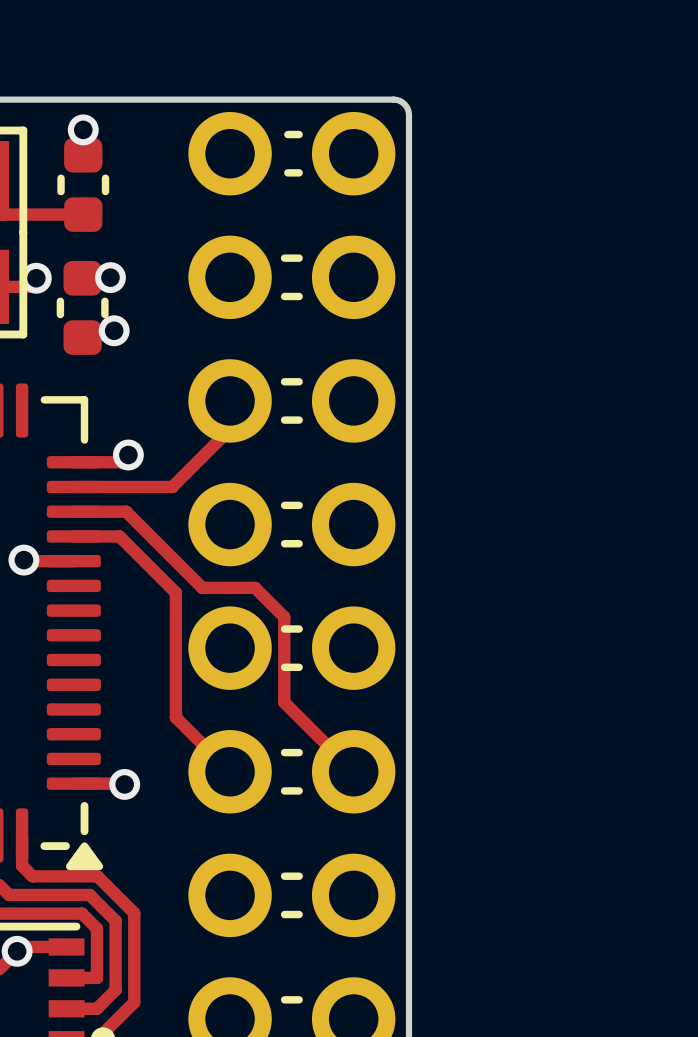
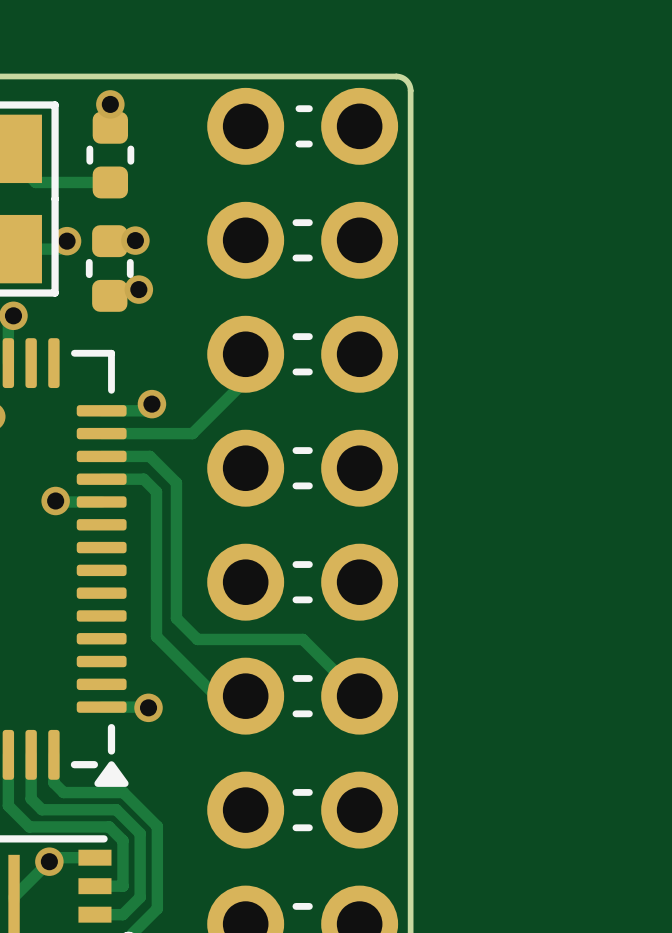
track: (154, 540) (202, 587) (255, 587) (284, 617) (284, 702) (292, 710) -> (176, 482) (176, 618) (197, 639) (302, 639)
track: (133, 550) (175, 592) (175, 717) (230, 771) -> (156, 491) (156, 636) (216, 696) (245, 696)

